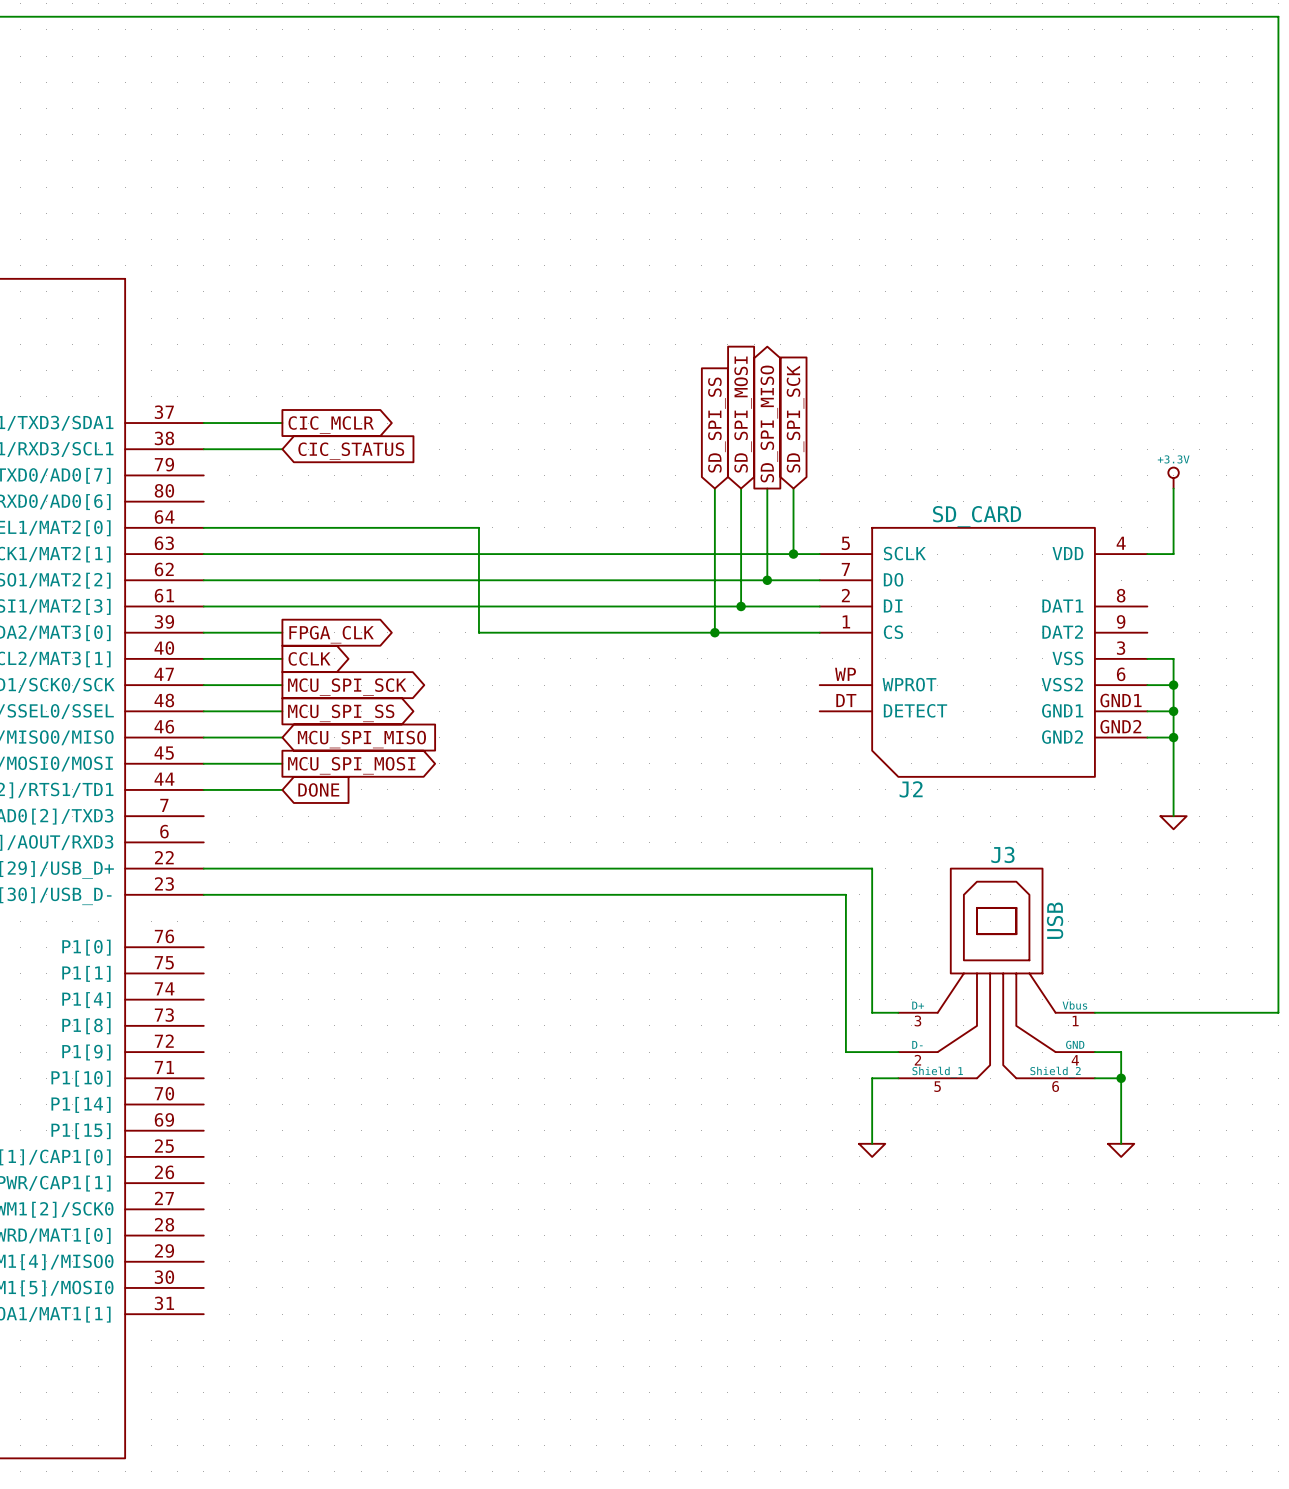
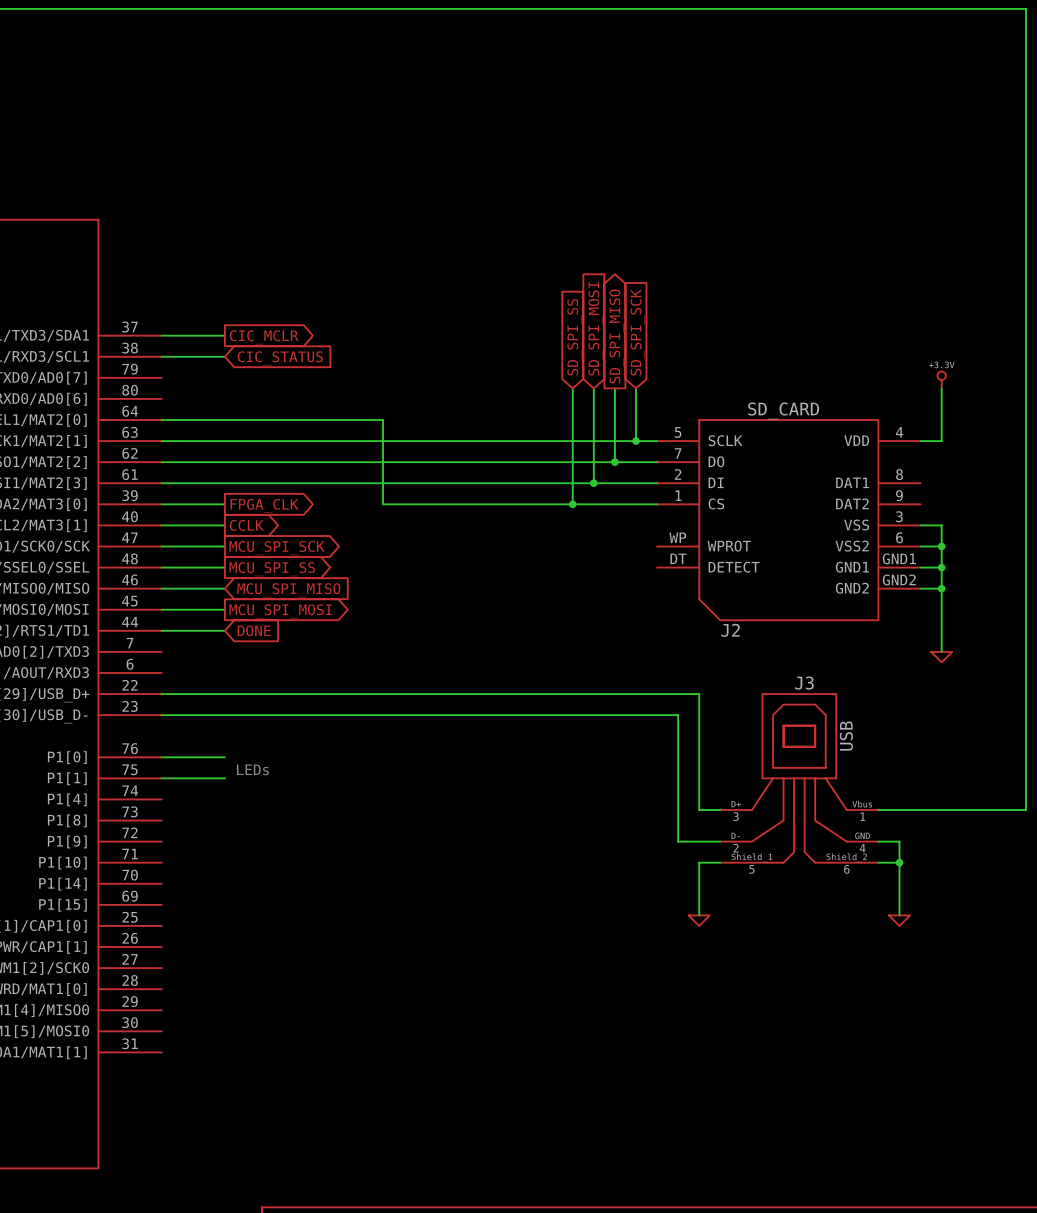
wire: none -> (161, 757) (224, 757)
text: none -> LEDs (252, 769)
wire: none -> (161, 778) (224, 778)

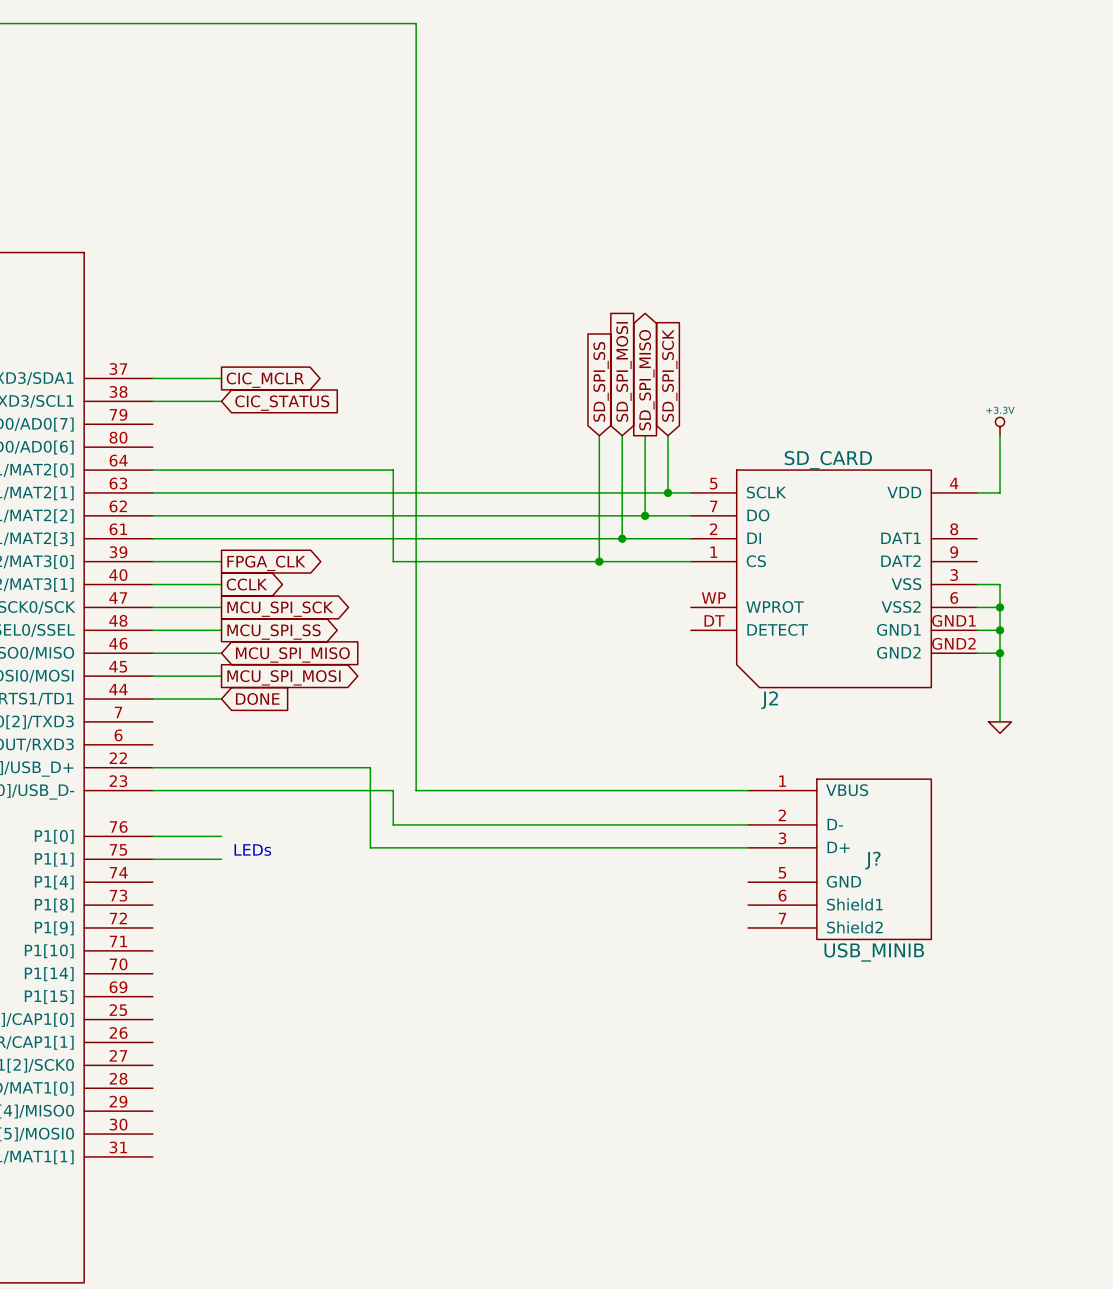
wire: (404, 8) (1025, 8) (1025, 810) (878, 810) -> (416, 23) (416, 790)
wire: (361, 694) (699, 694) (699, 810) (720, 810) -> (370, 767) (370, 847) (748, 847)
wire: (383, 715) (404, 715) -> (393, 790) (393, 824) (748, 824)
wire: (678, 715) (678, 841) (720, 841) -> (713, 790) (748, 790)
J?: none -> USB_MINIB (839, 859)
J3: USB (799, 778) -> none
wire: (878, 841) (899, 841) (899, 915) -> none
wire: (720, 862) (699, 862) (699, 915) -> none
wire: (878, 862) (899, 862) -> none
junction: (899, 862) -> none
power symbol: (699, 920) -> none
power symbol: (899, 920) -> none

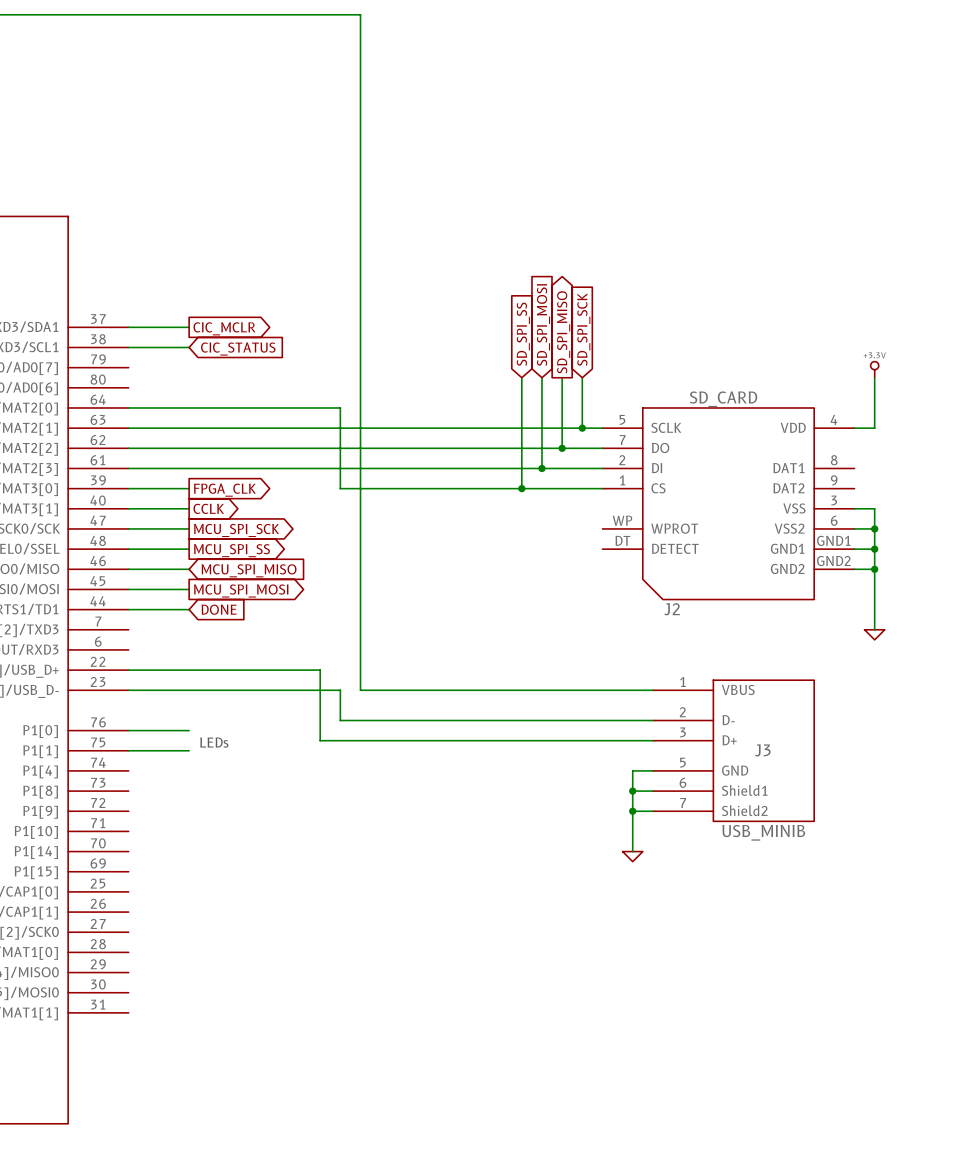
J? name: J? (872, 860) -> J3 (762, 750)
wire: none -> (652, 770) (632, 770) (632, 851)
wire: none -> (632, 791) (652, 791)
junction: none -> (632, 791)
wire: none -> (632, 811) (652, 811)
junction: none -> (632, 811)
power symbol: none -> (632, 856)

